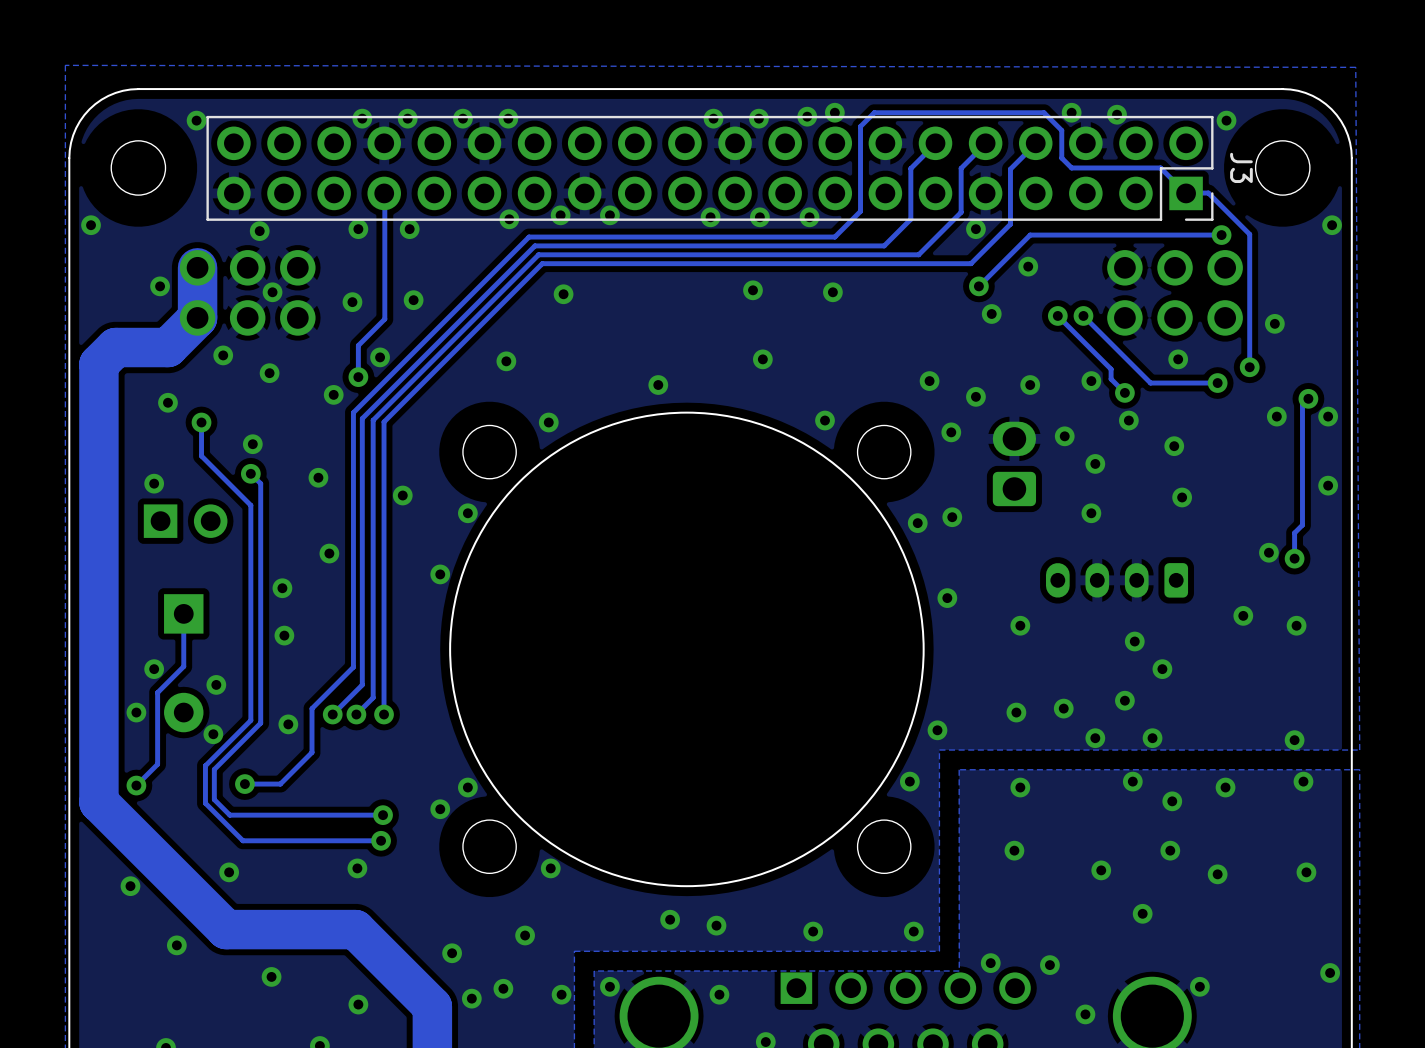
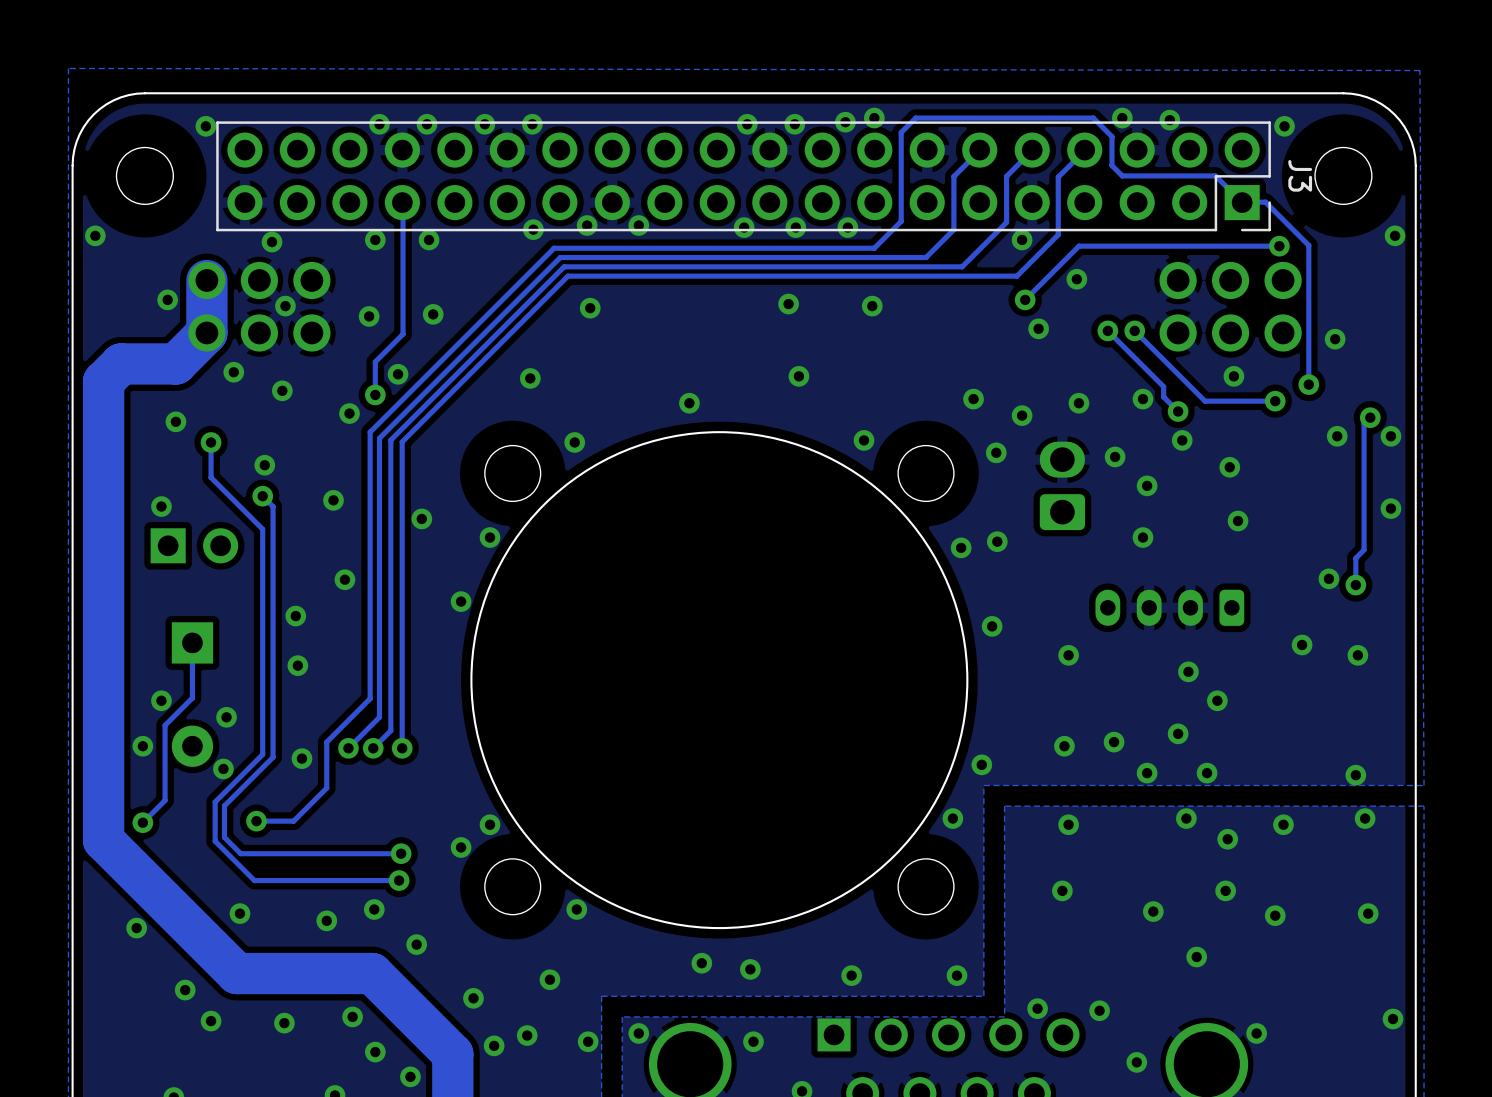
via: none -> (326, 920)
via: none -> (416, 944)
via: none -> (352, 1016)
via: none -> (211, 1021)
via: none -> (410, 1076)

